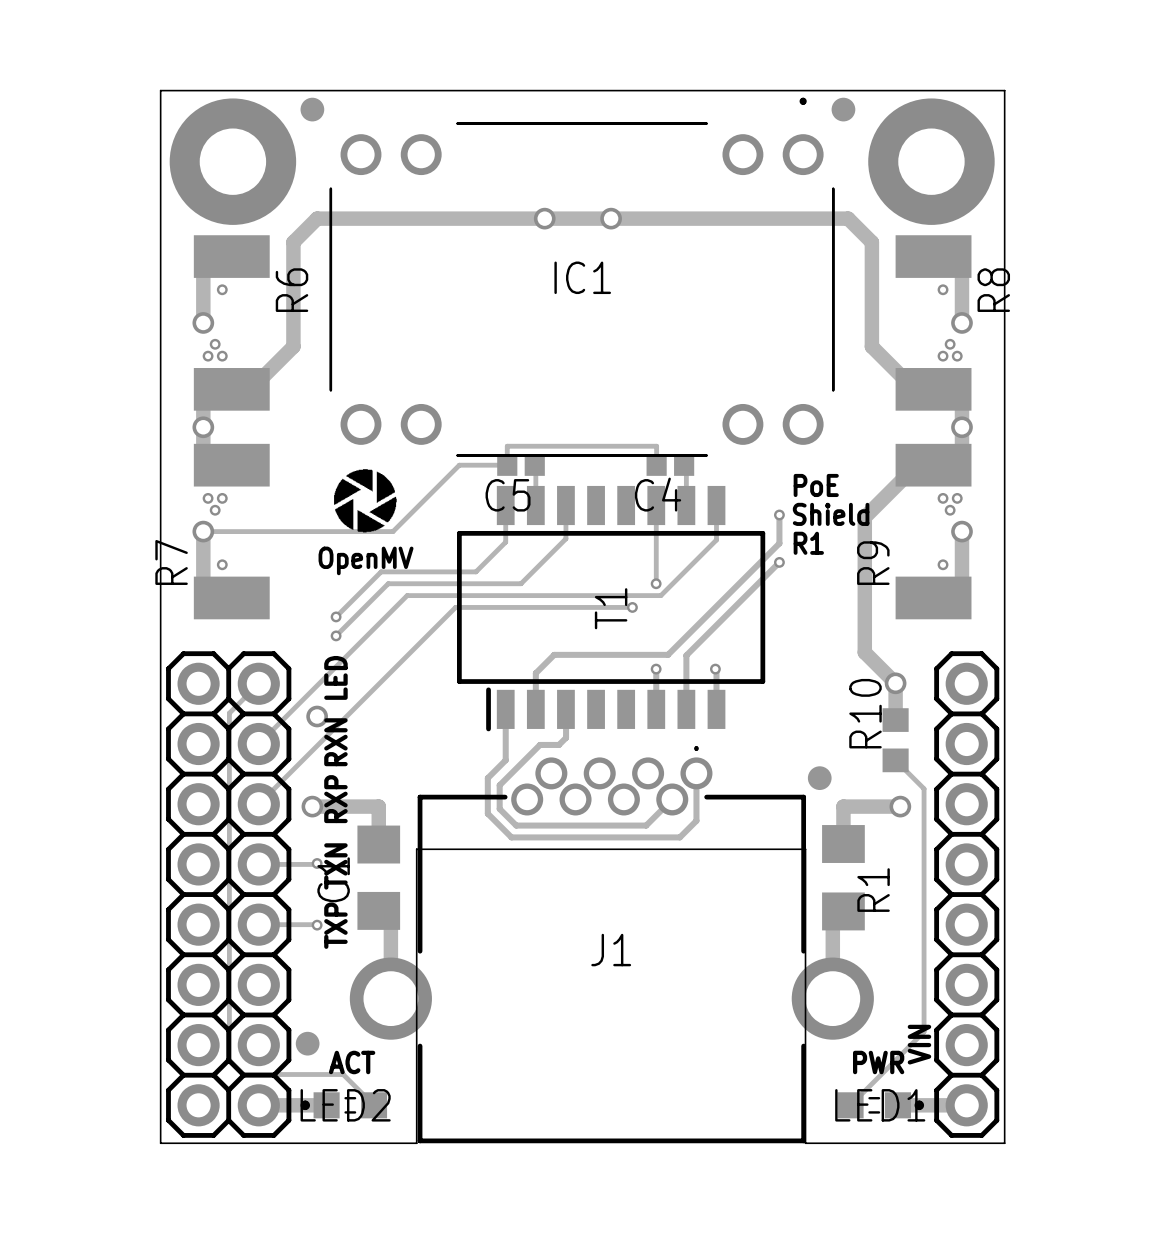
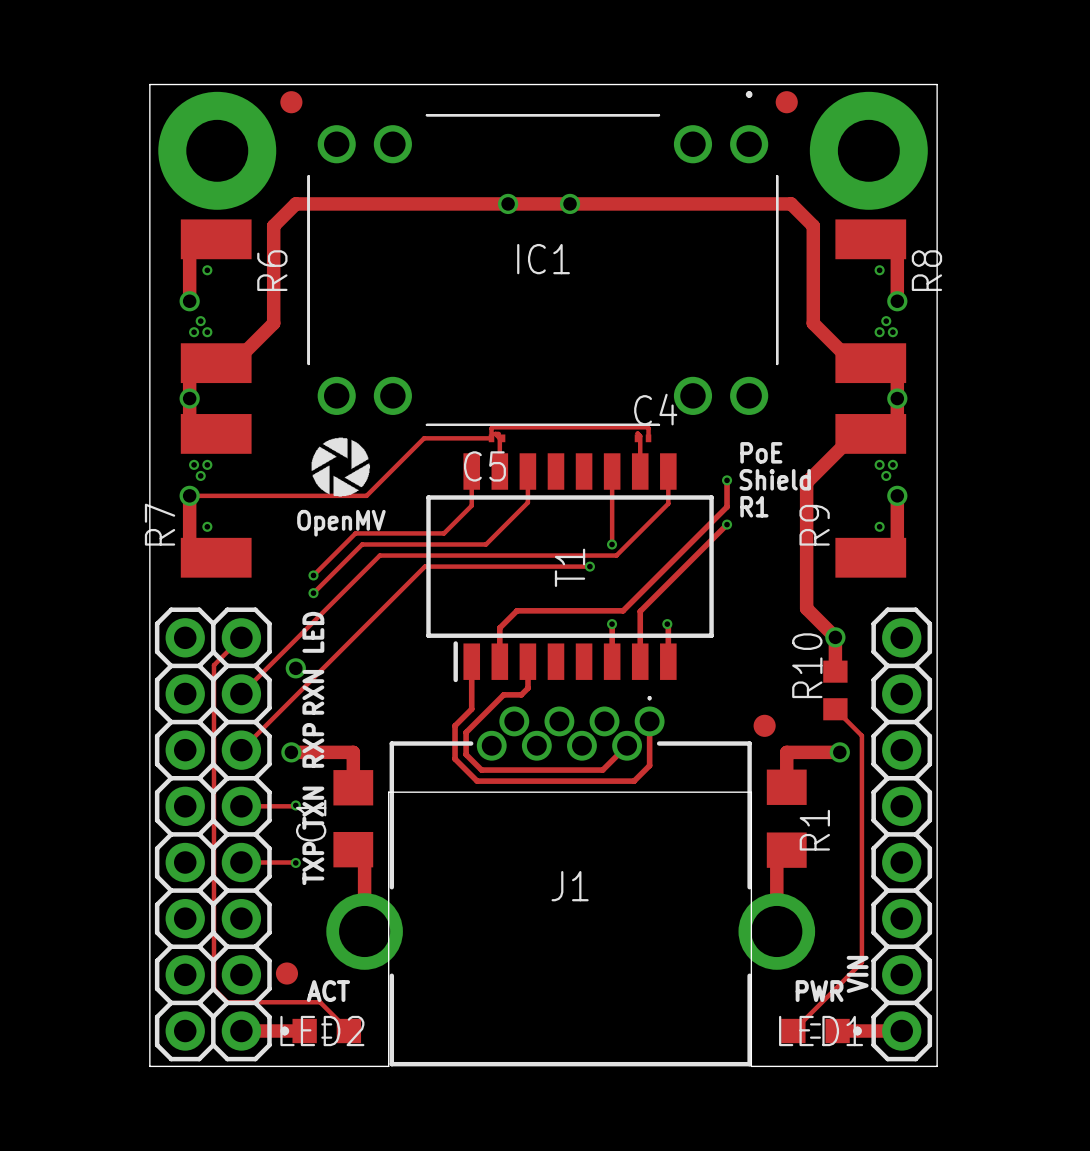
C5 footprint: [497, 454, 545, 476] -> [488, 434, 506, 443]
C4 footprint: [646, 454, 695, 476] -> [634, 434, 652, 443]
track: (656, 465) (656, 446) (507, 446) (507, 465) (459, 465) (454, 469) -> (648, 438) (647, 427) (492, 427) (491, 438) (424, 438)
C4 name position: C4 (658, 494) -> C4 (655, 409)

